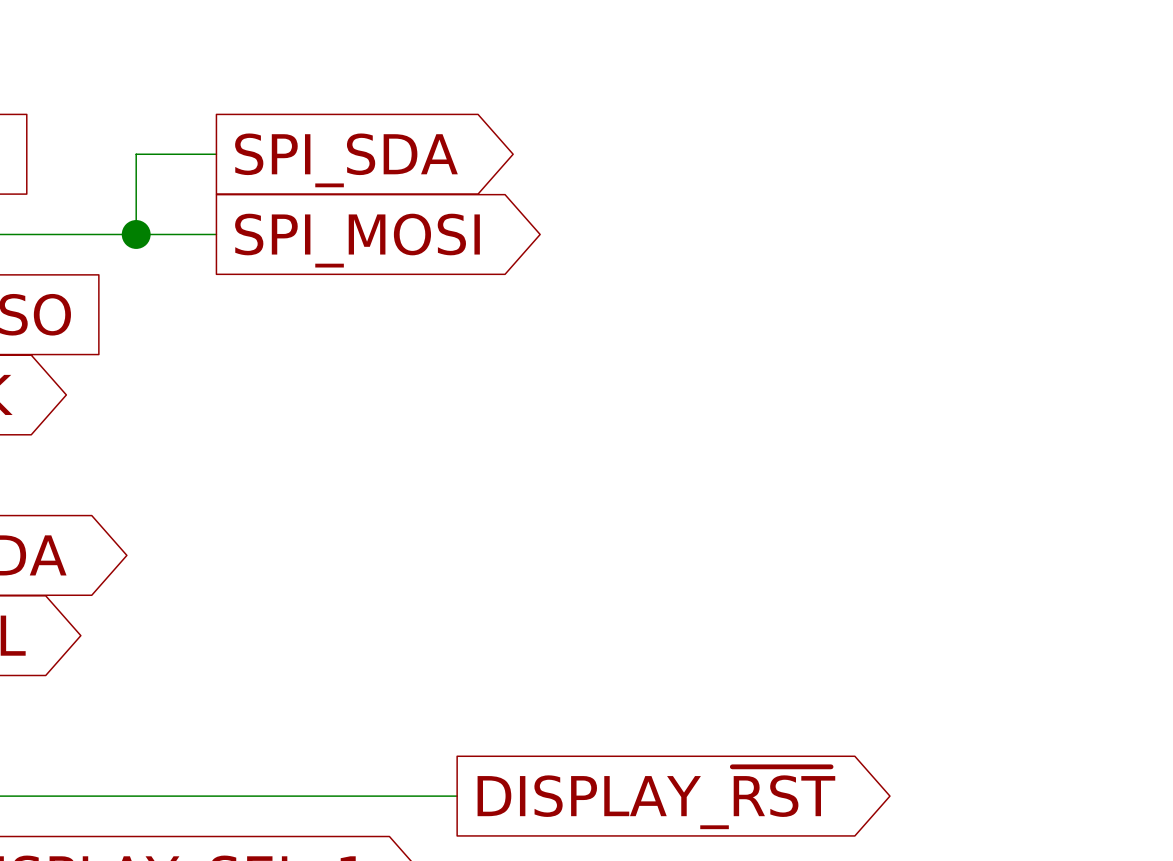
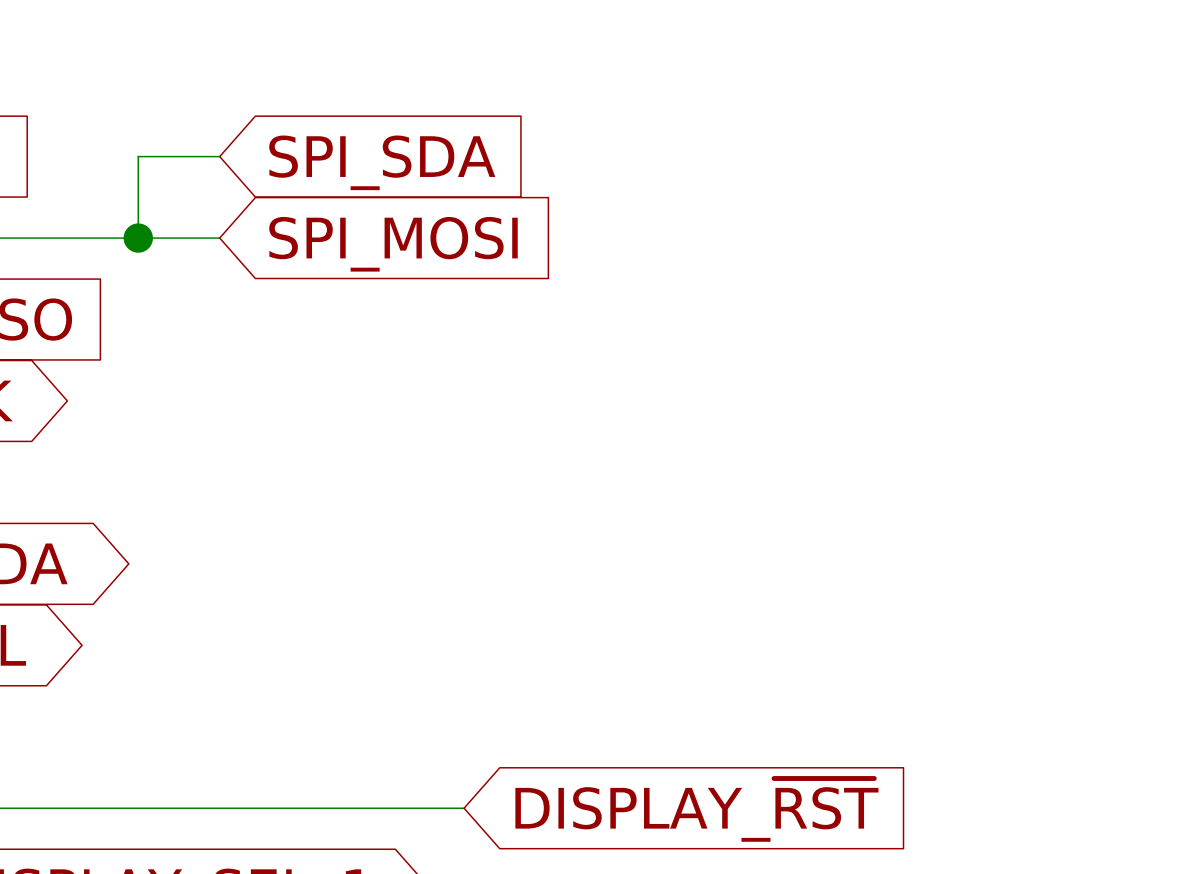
global label shape: output (346, 160) -> input (382, 162)
global label shape: output (357, 240) -> input (393, 244)
global label shape: output (656, 797) -> input (696, 810)

